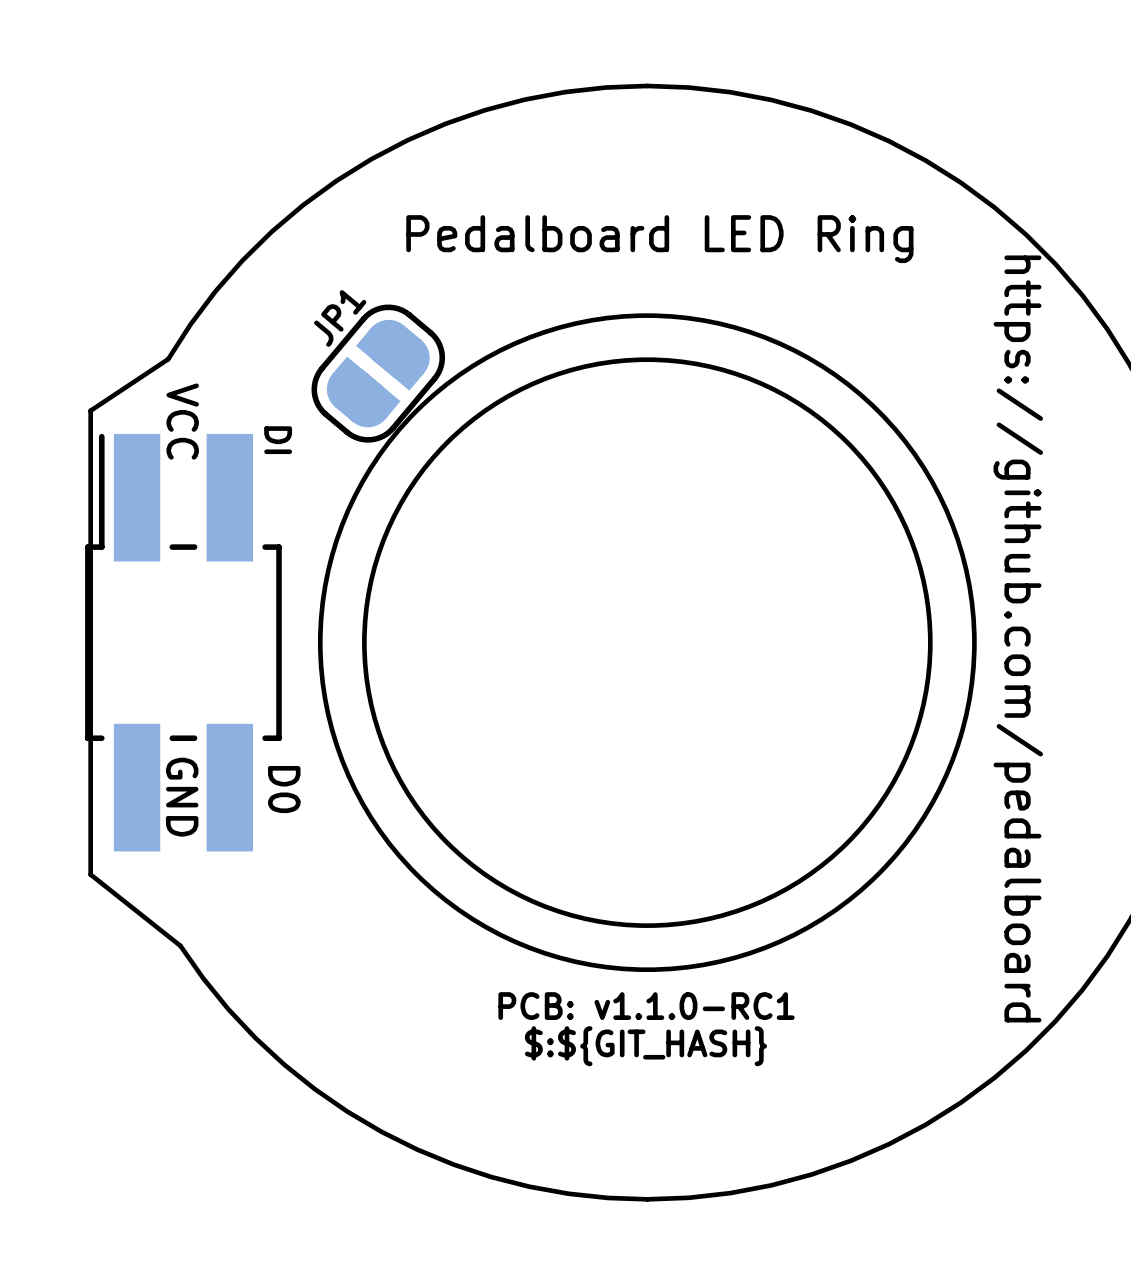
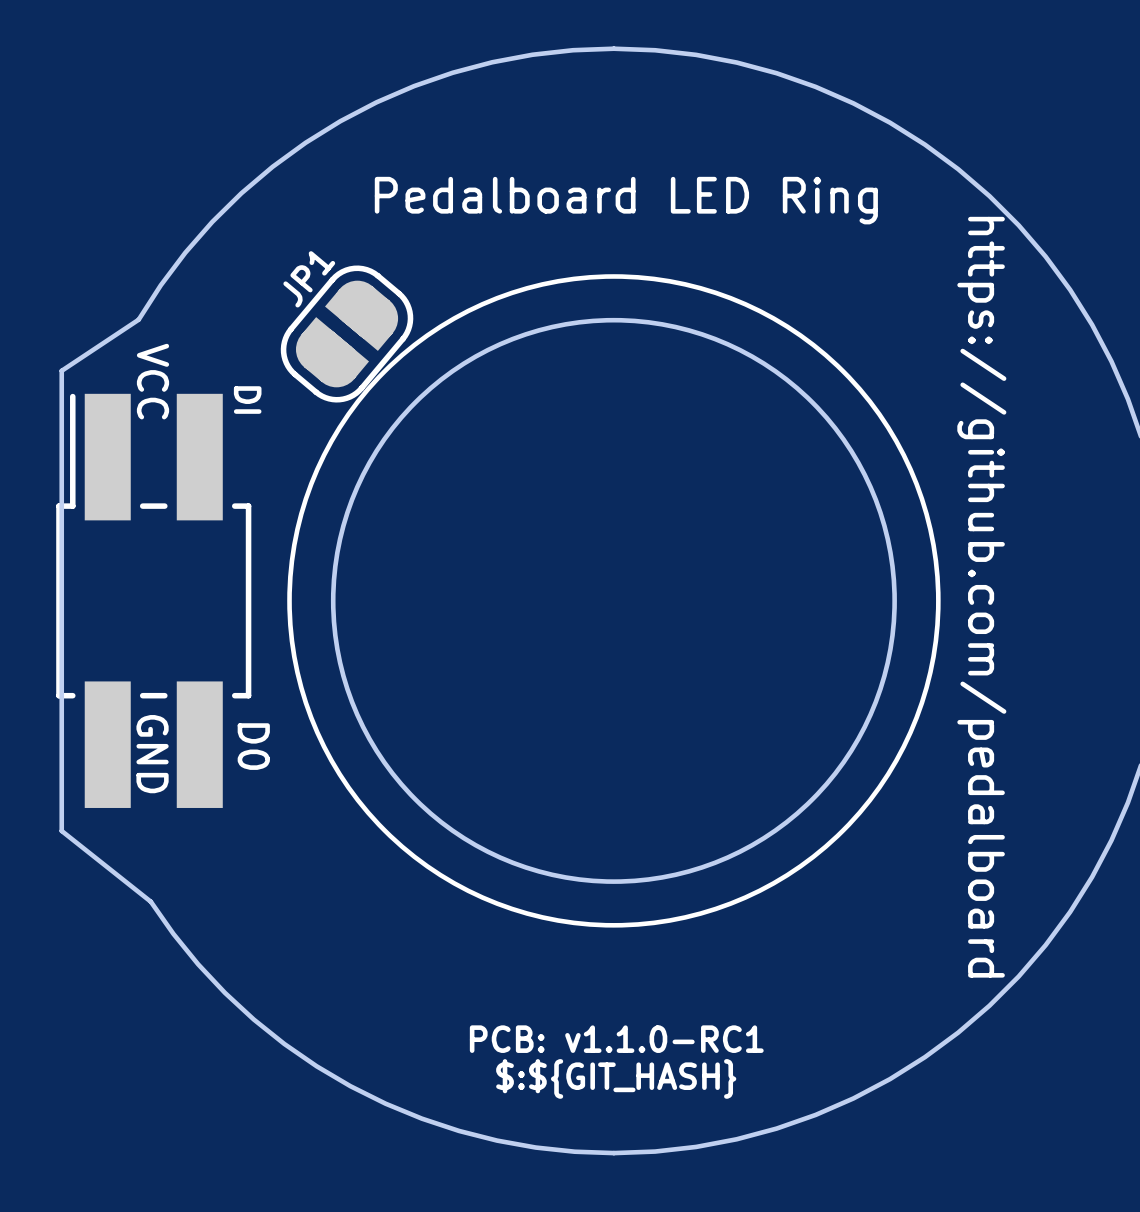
text position: PCB: v1.1.0-RC1 (646, 1006) -> PCB: v1.1.0-RC1 (616, 1039)
text position: $:${GIT_HASH} (645, 1046) -> $:${GIT_HASH} (616, 1078)

